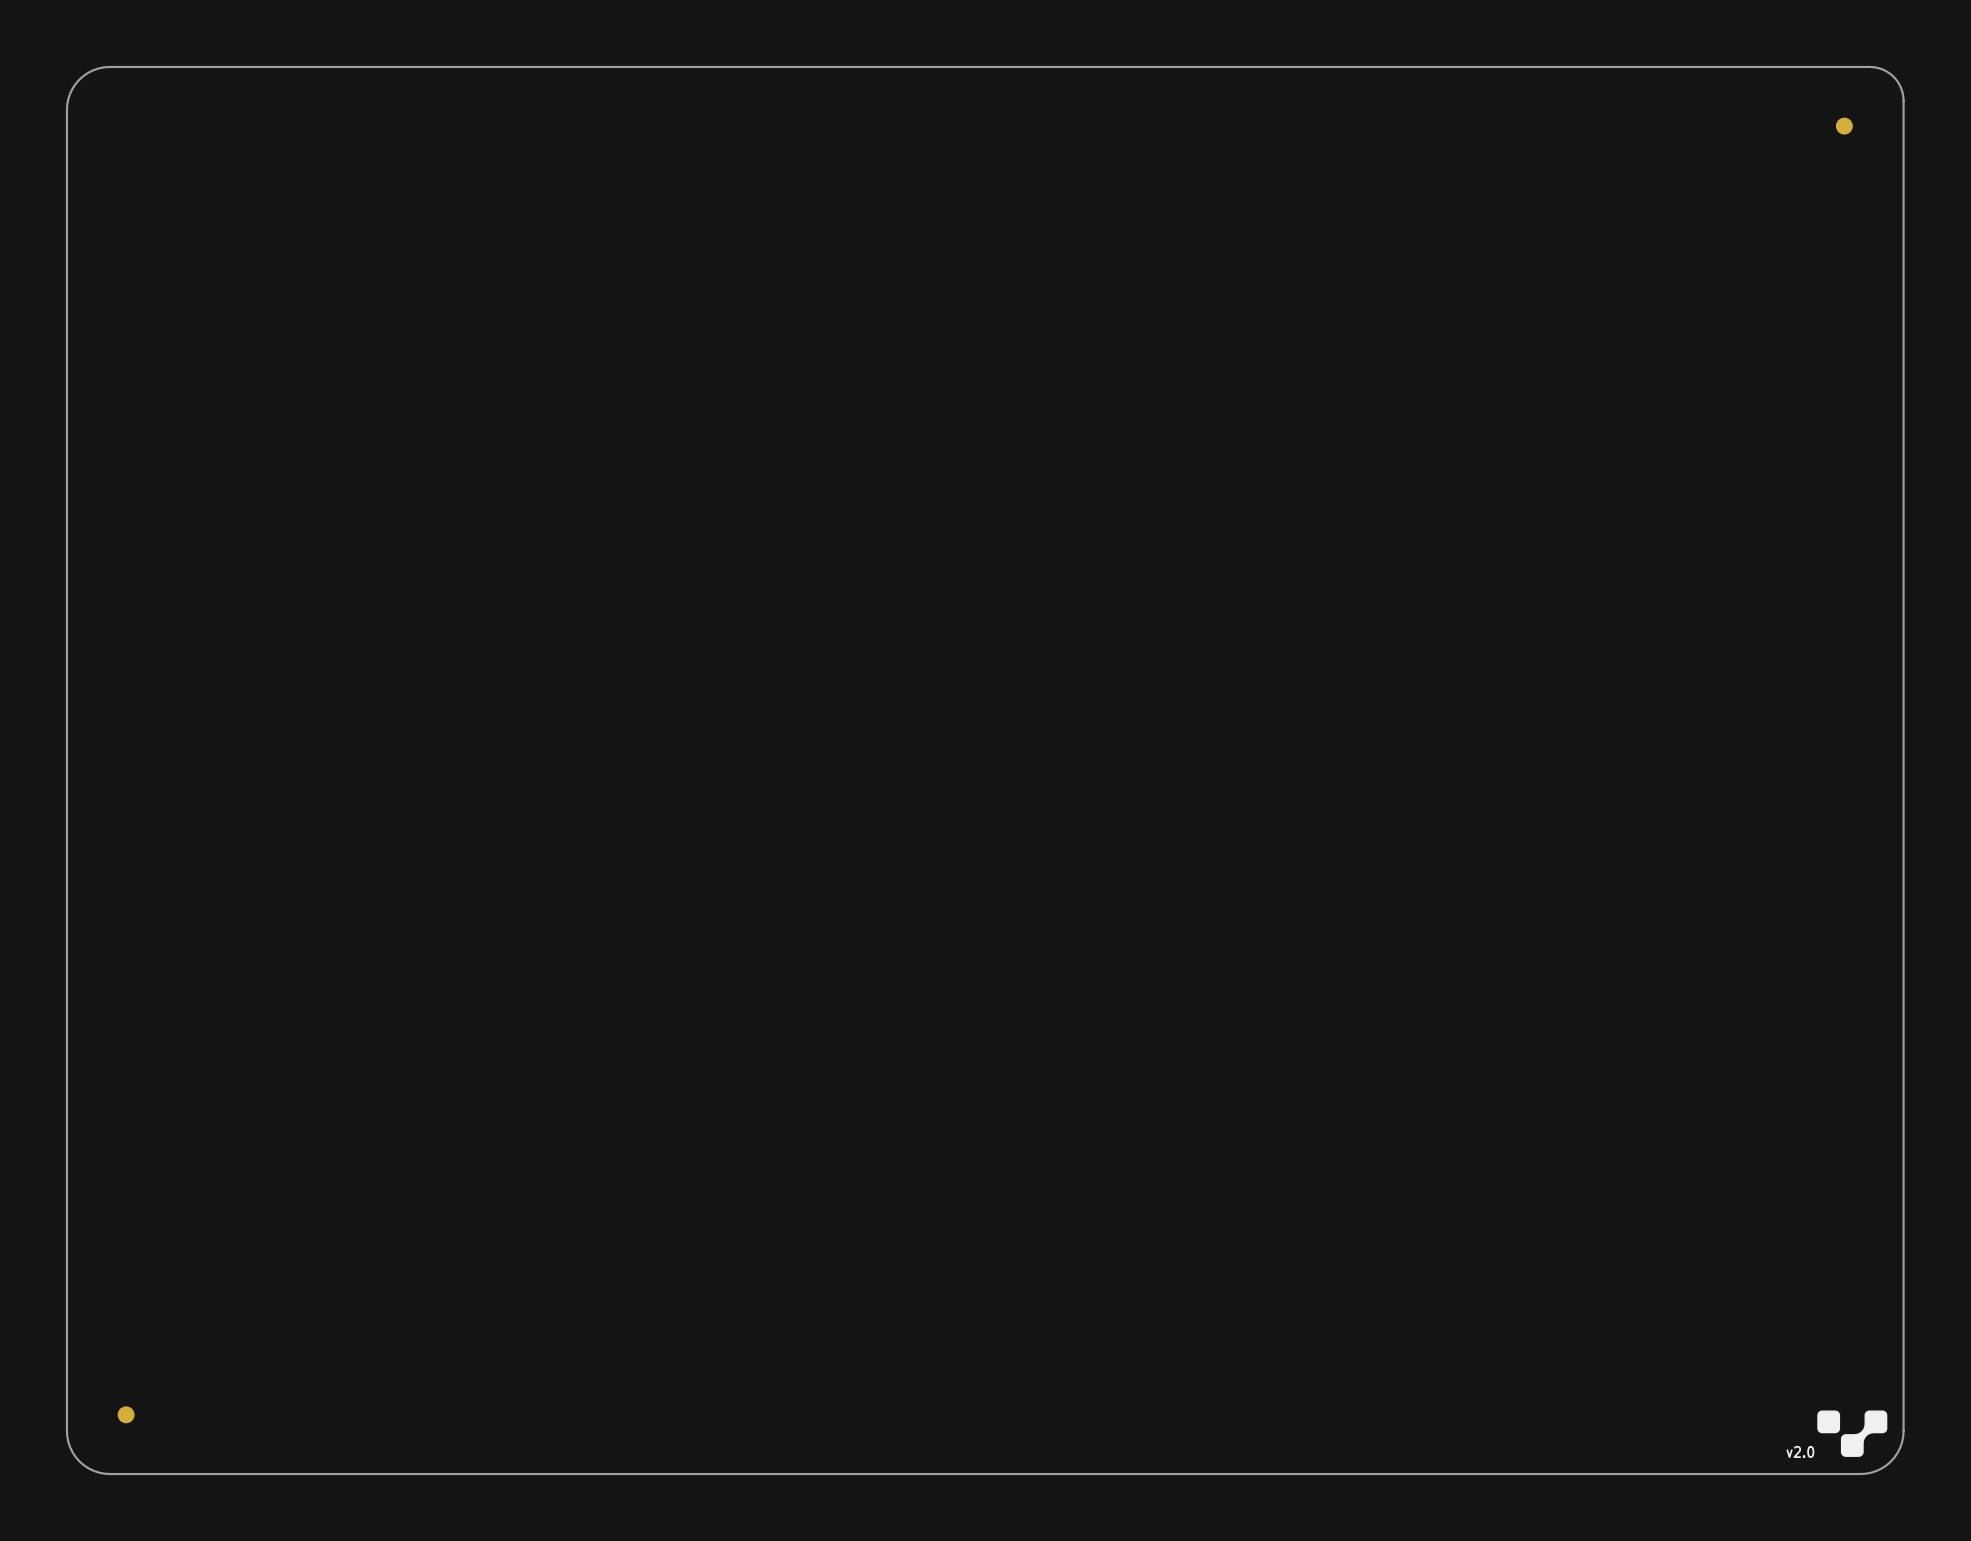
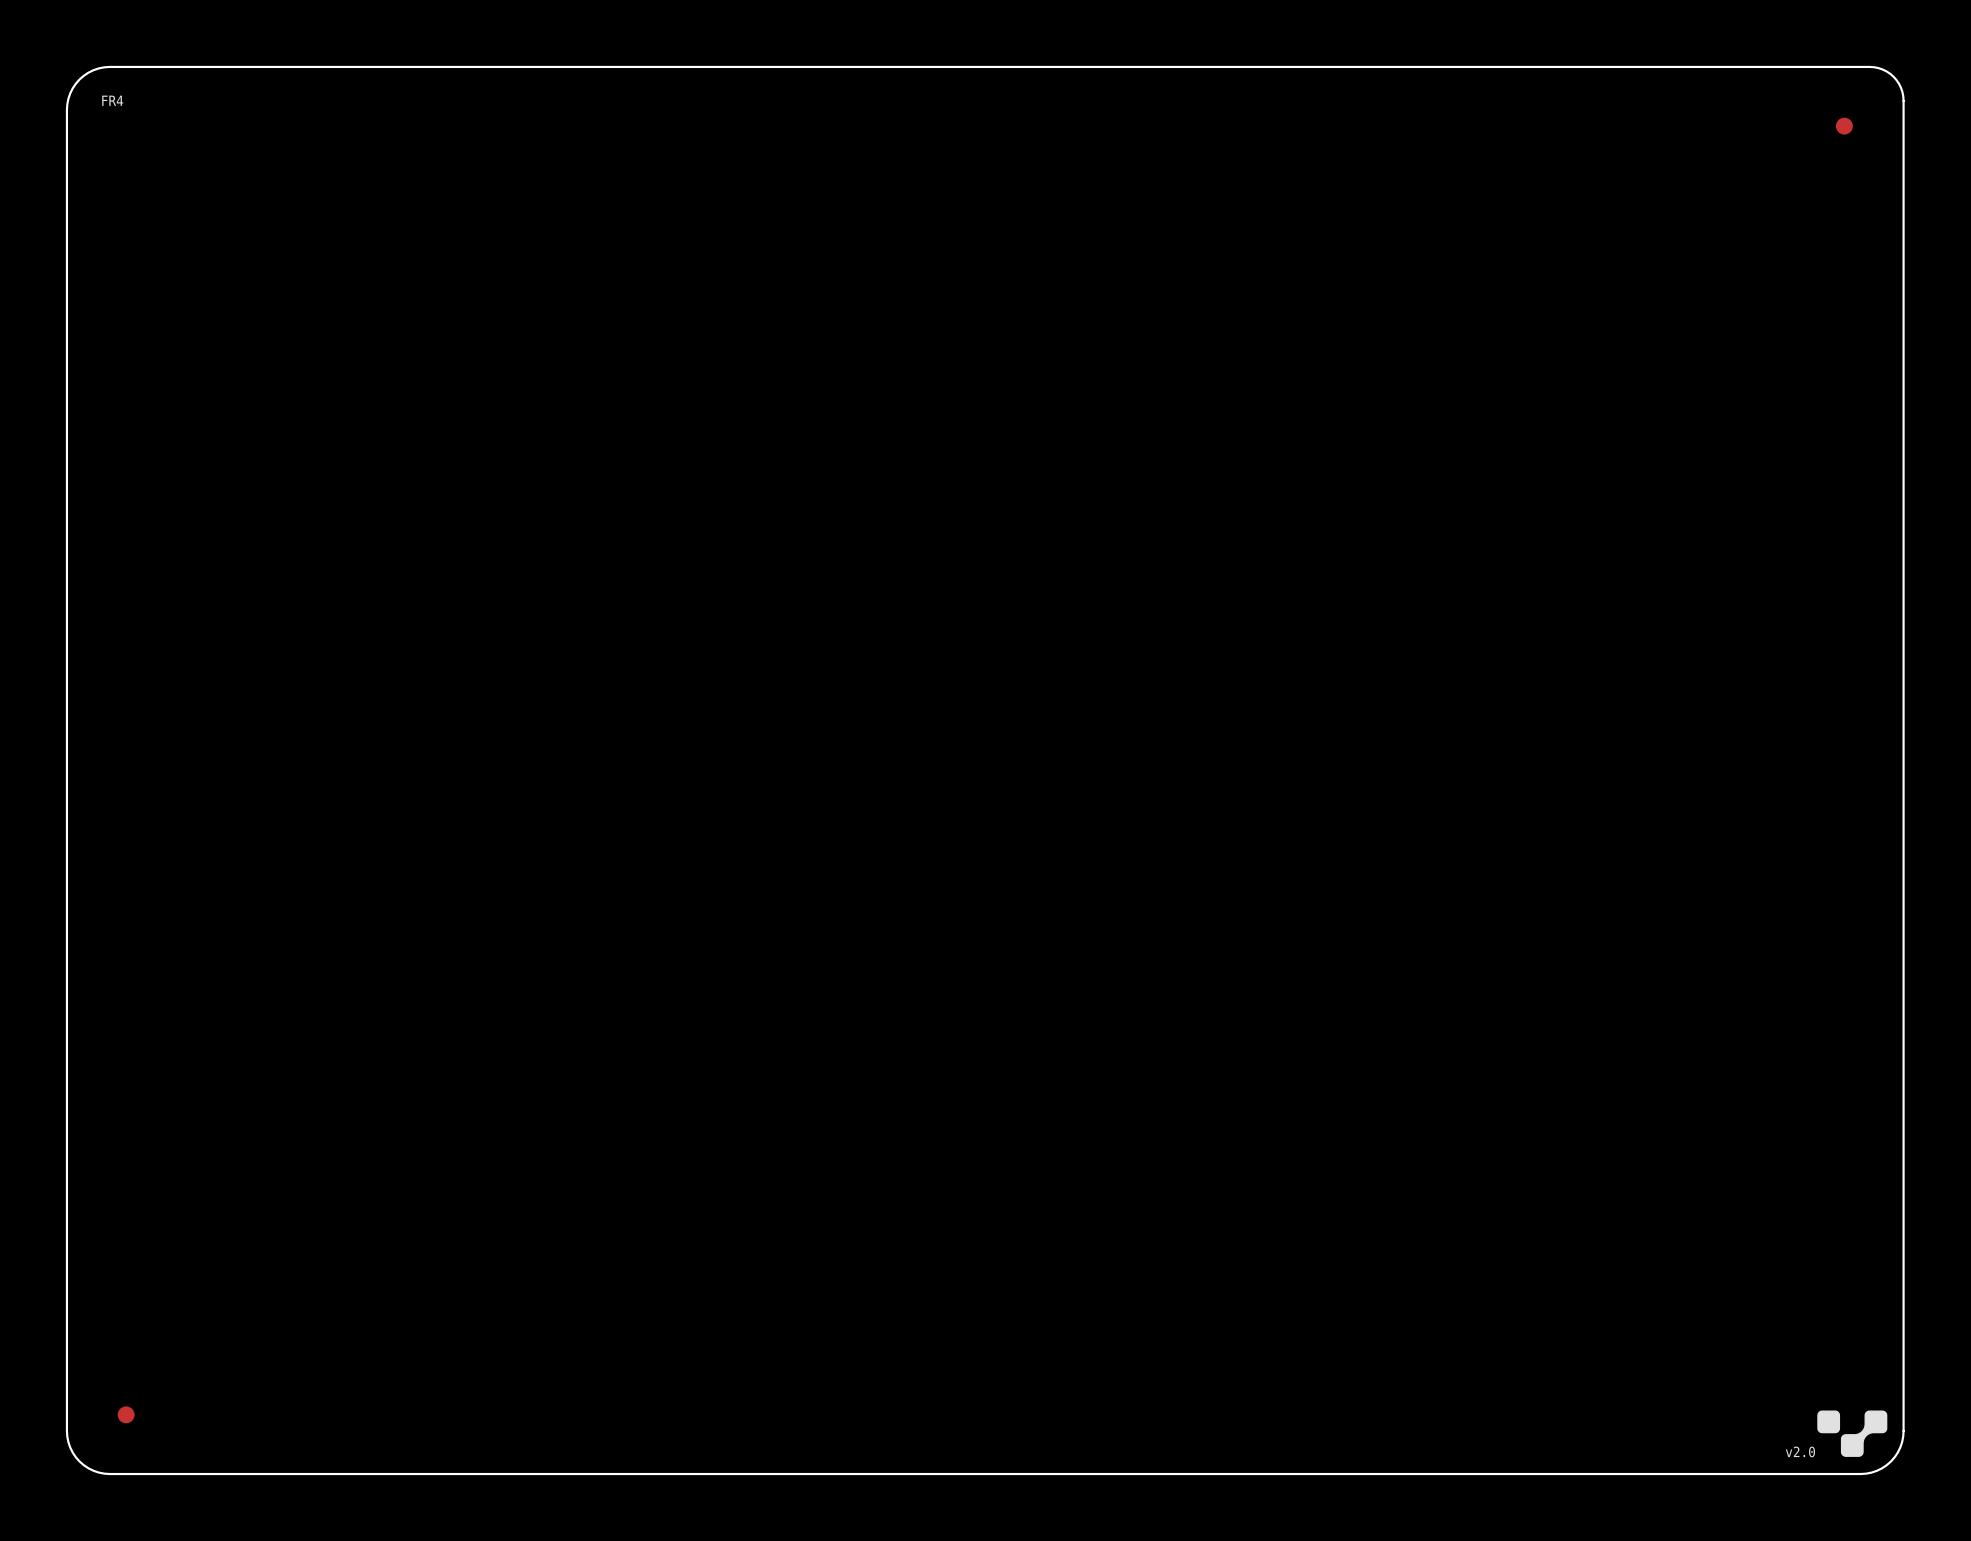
part text: none -> FR4 (112, 100)

